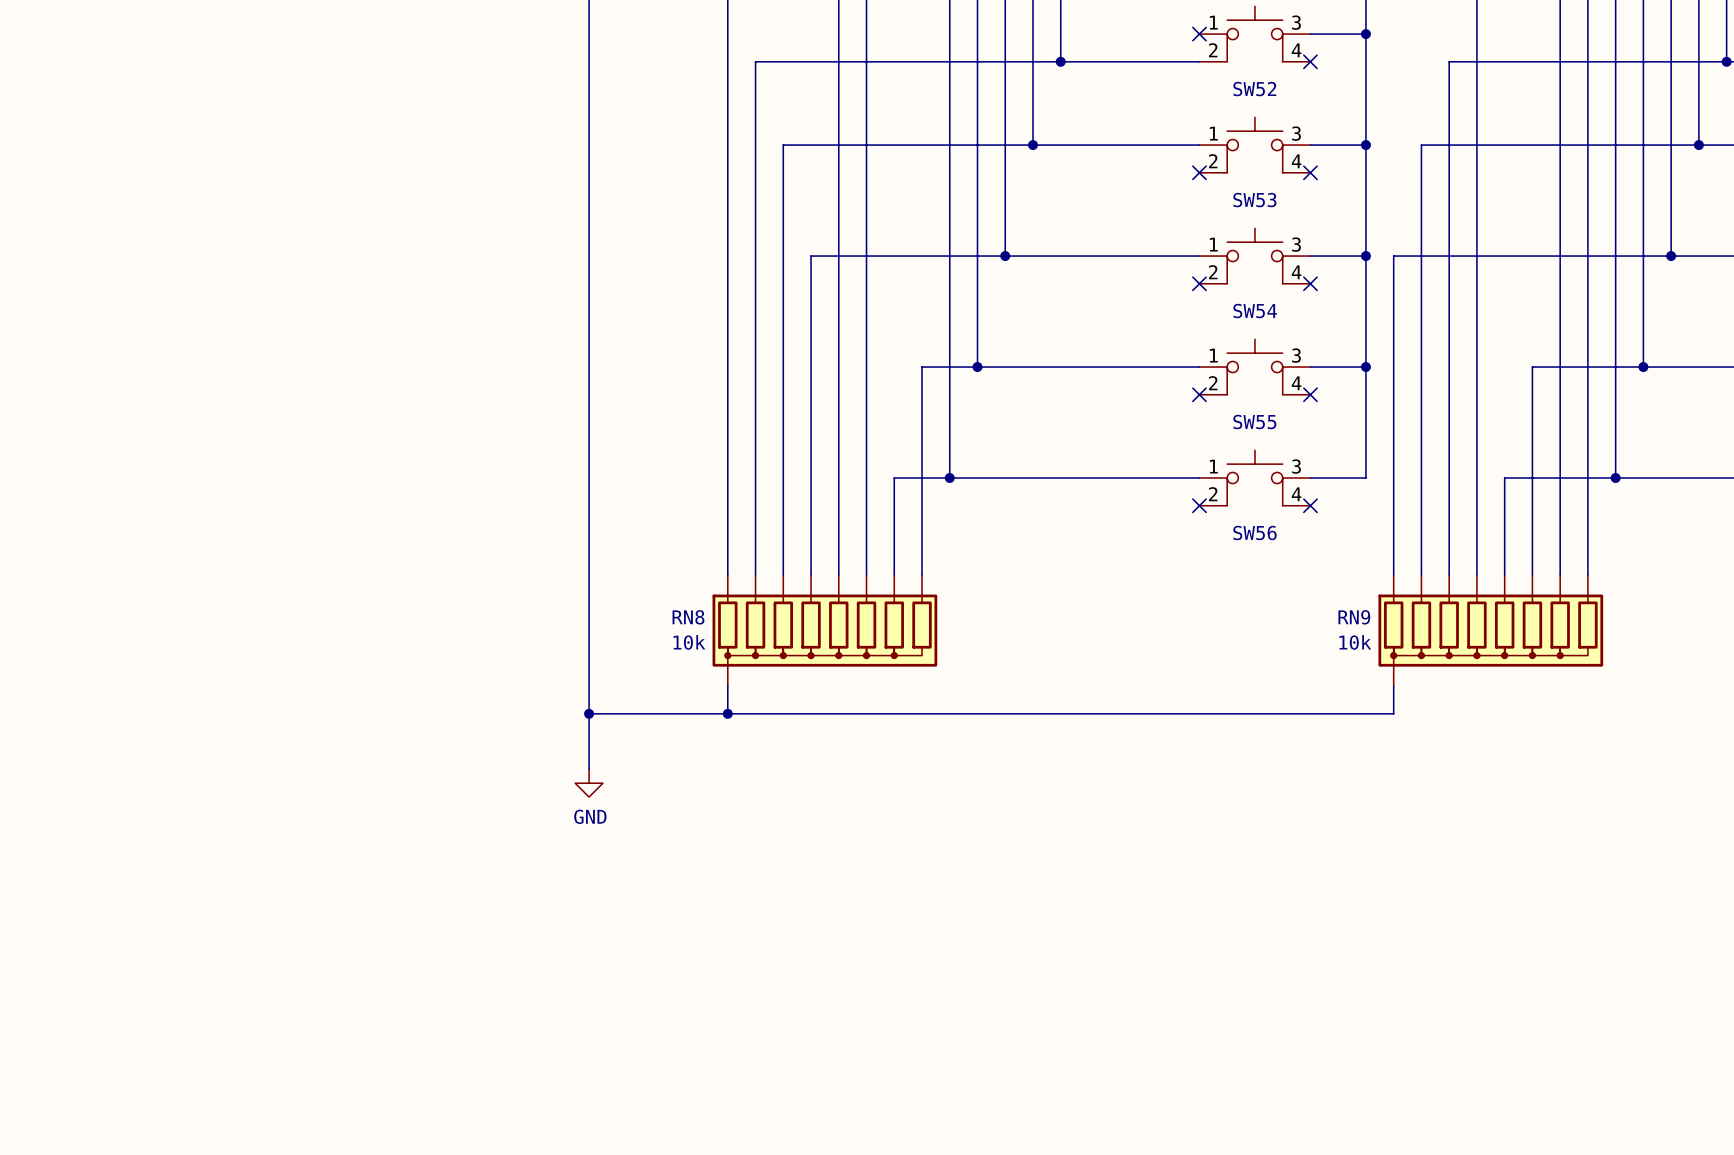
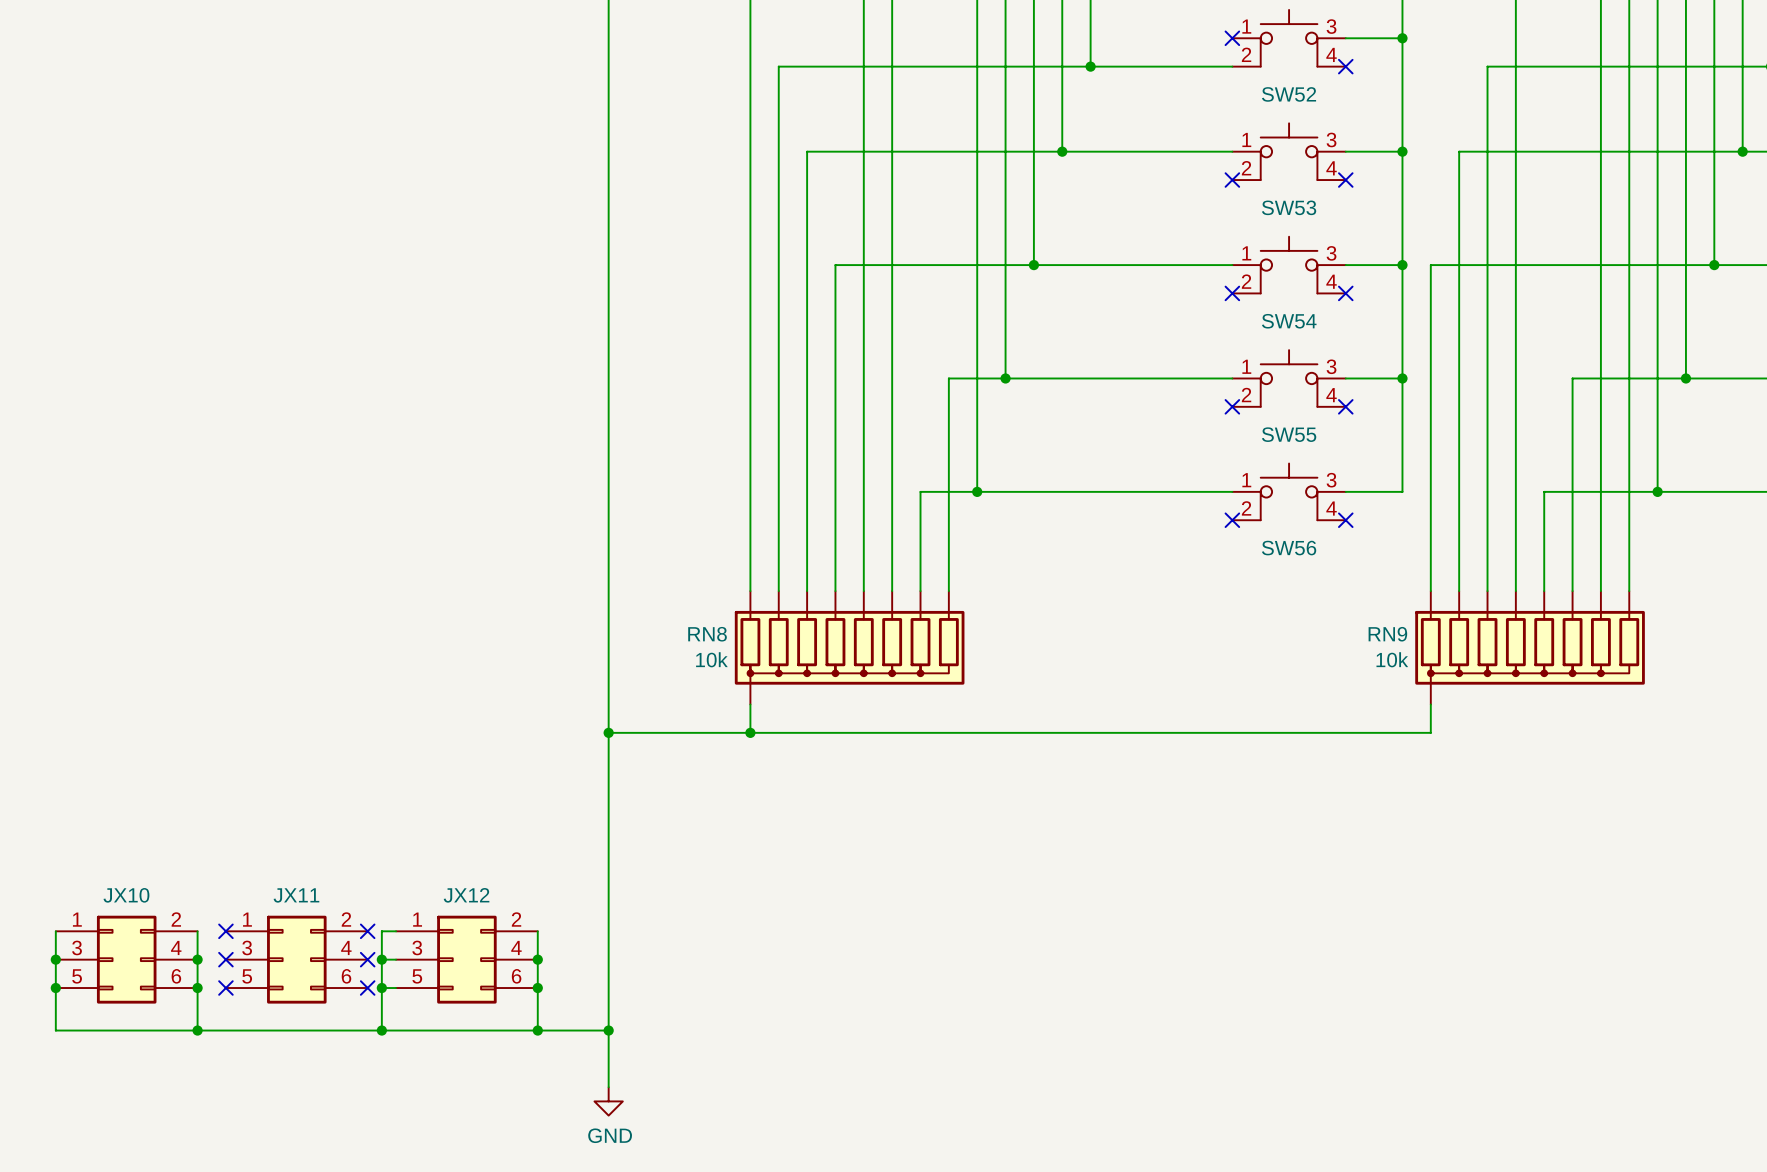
wire: none -> (608, 789) (608, 1087)
power symbol: GND (589, 783) -> none
wire: none -> (55, 931) (55, 1030) (608, 1030)
wire: none -> (197, 931) (197, 1030)
no-connect mark: none -> (225, 931)
no-connect mark: none -> (367, 931)
wire: none -> (396, 931) (381, 931) (381, 1030)
wire: none -> (537, 931) (537, 1030)
junction: none -> (55, 959)
JX10: none -> (126, 959)
junction: none -> (197, 959)
no-connect mark: none -> (225, 959)
JX11: none -> (296, 959)
no-connect mark: none -> (367, 959)
wire: none -> (381, 959) (396, 959)
junction: none -> (381, 959)
JX12: none -> (466, 959)
junction: none -> (537, 959)
junction: none -> (55, 988)
junction: none -> (197, 988)
no-connect mark: none -> (225, 988)
no-connect mark: none -> (367, 988)
wire: none -> (381, 988) (396, 988)
junction: none -> (381, 988)
junction: none -> (537, 988)
junction: none -> (197, 1030)
junction: none -> (381, 1030)
junction: none -> (537, 1030)
junction: none -> (608, 1030)
power symbol: none -> GND (608, 1101)

